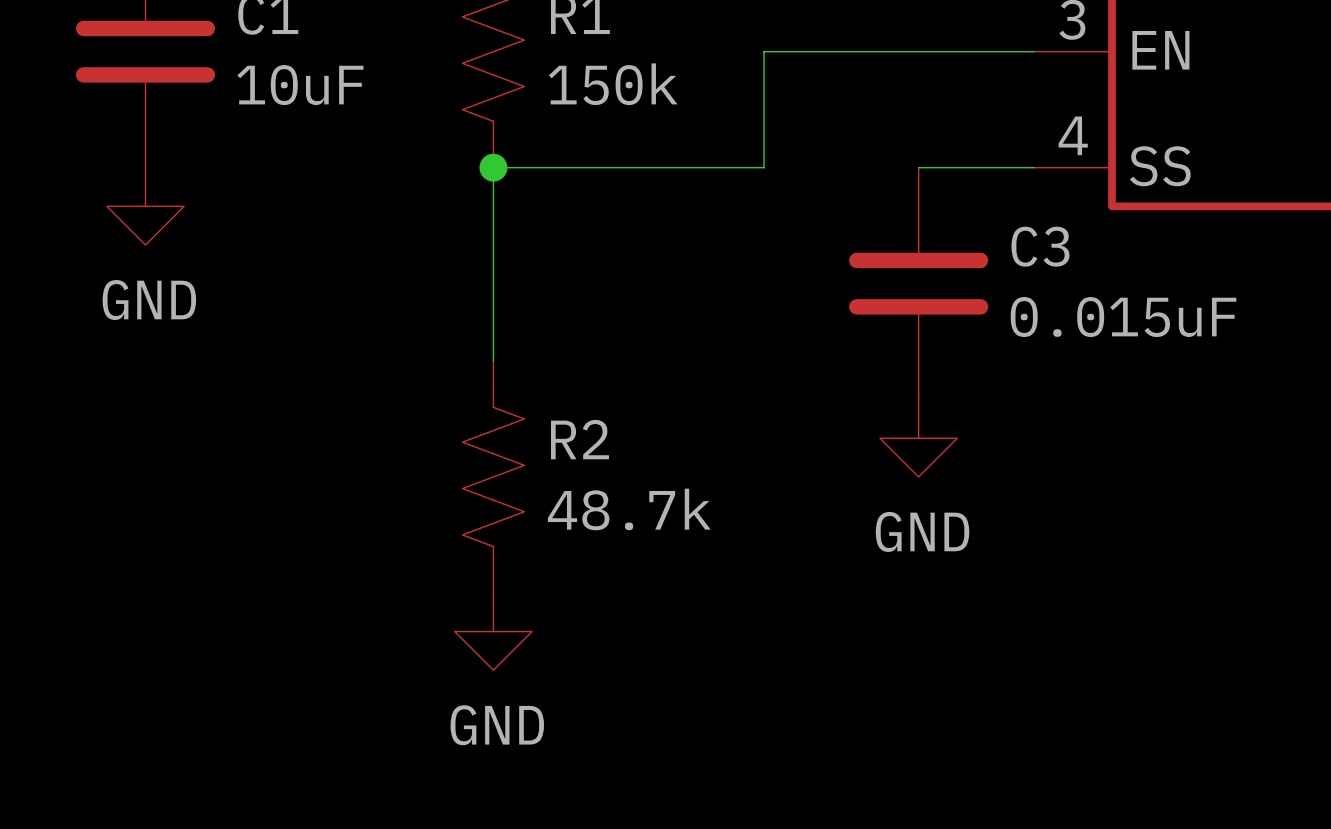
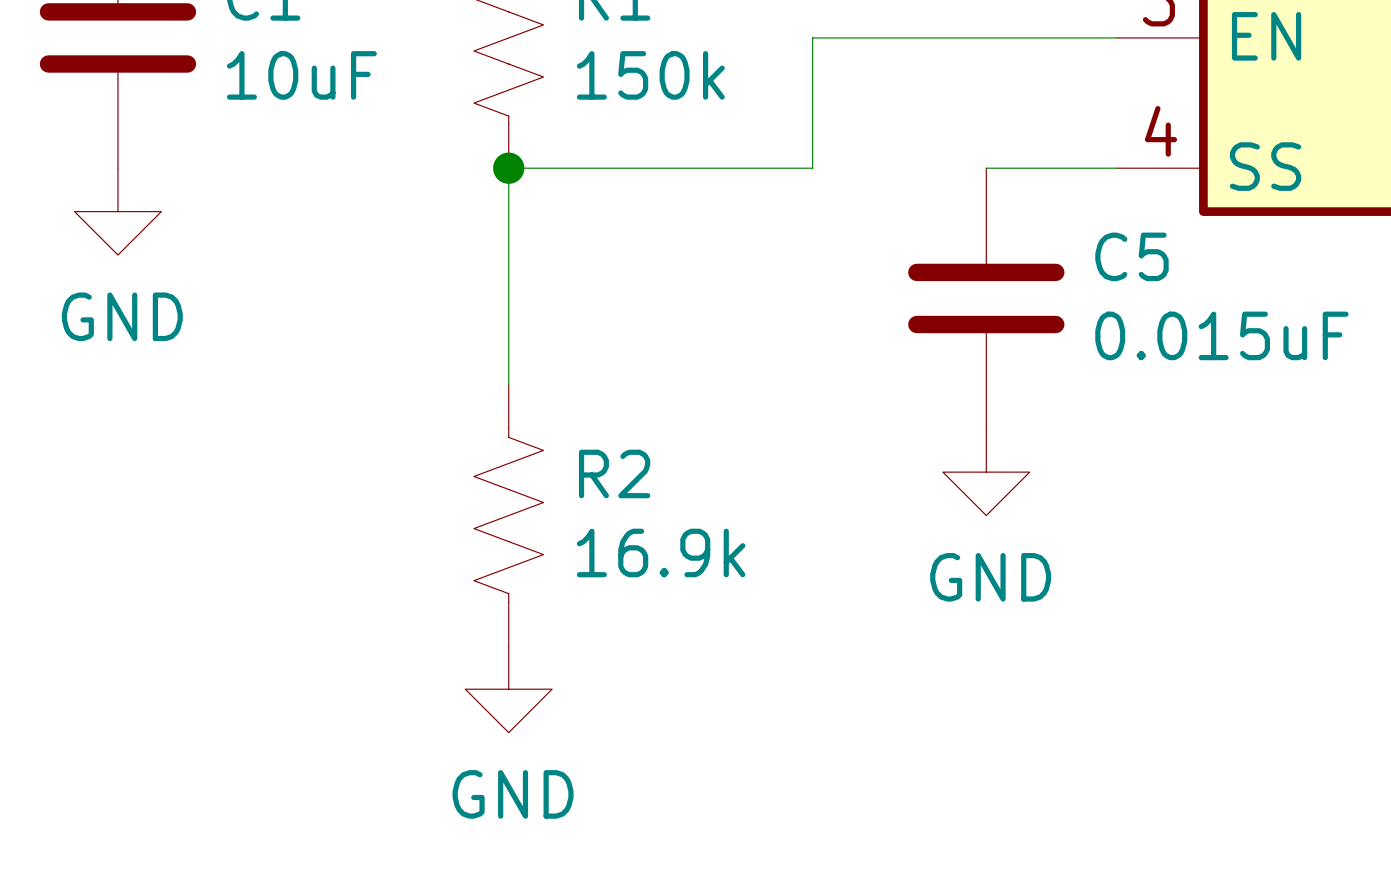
C3 name: C3 (1040, 246) -> C5 (1131, 256)
R2 value: 48.7k (629, 509) -> 16.9k (661, 552)

